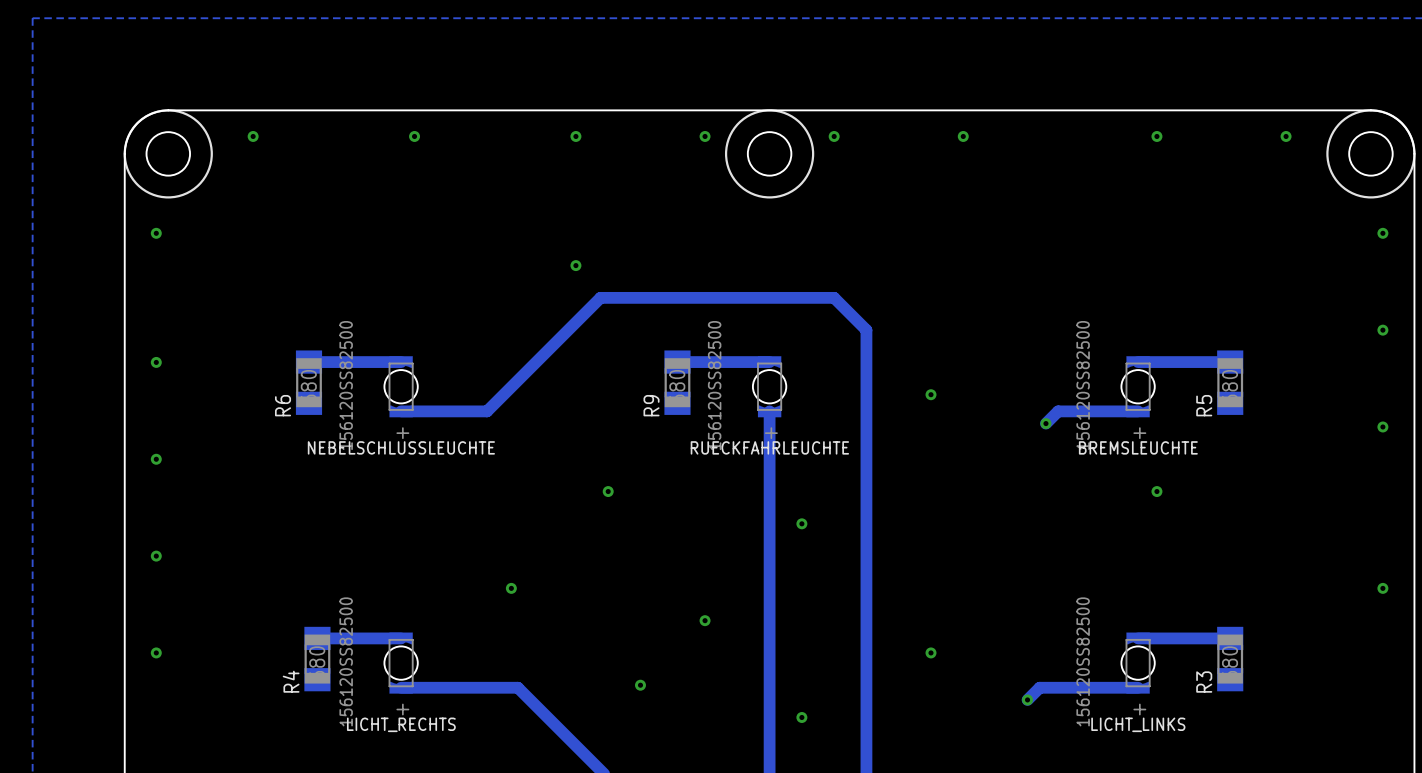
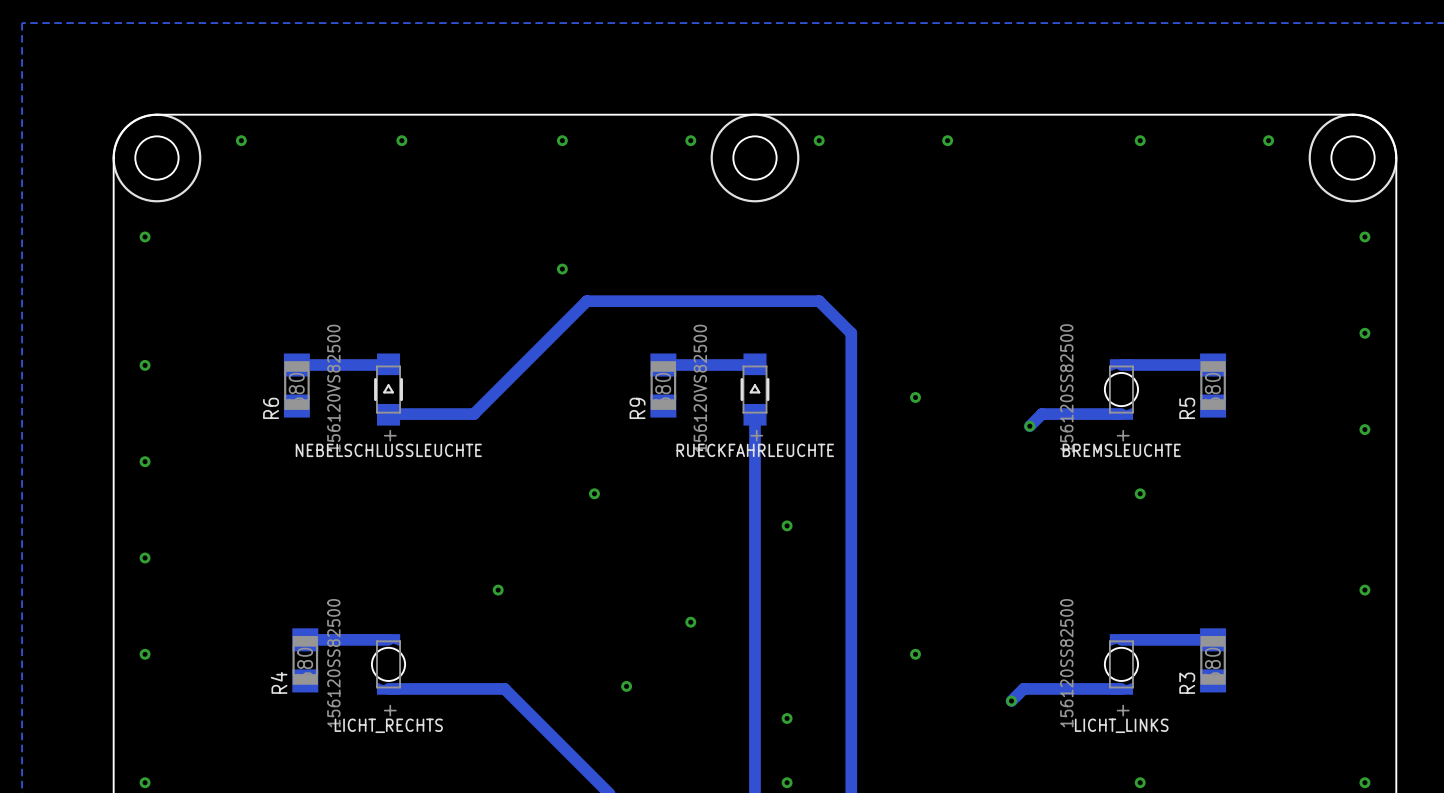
NEBELSCHLUSSLEUCHTE footprint: [384, 356, 418, 418] -> [374, 353, 403, 426]
RUECKFAHRLEUCHTE footprint: [752, 356, 787, 418] -> [740, 353, 770, 426]
NEBELSCHLUSSLEUCHTE value: 156120SS82500 (346, 385) -> 156120VS82500 (333, 388)
RUECKFAHRLEUCHTE value: 156120SS82500 (714, 385) -> 156120VS82500 (700, 388)

